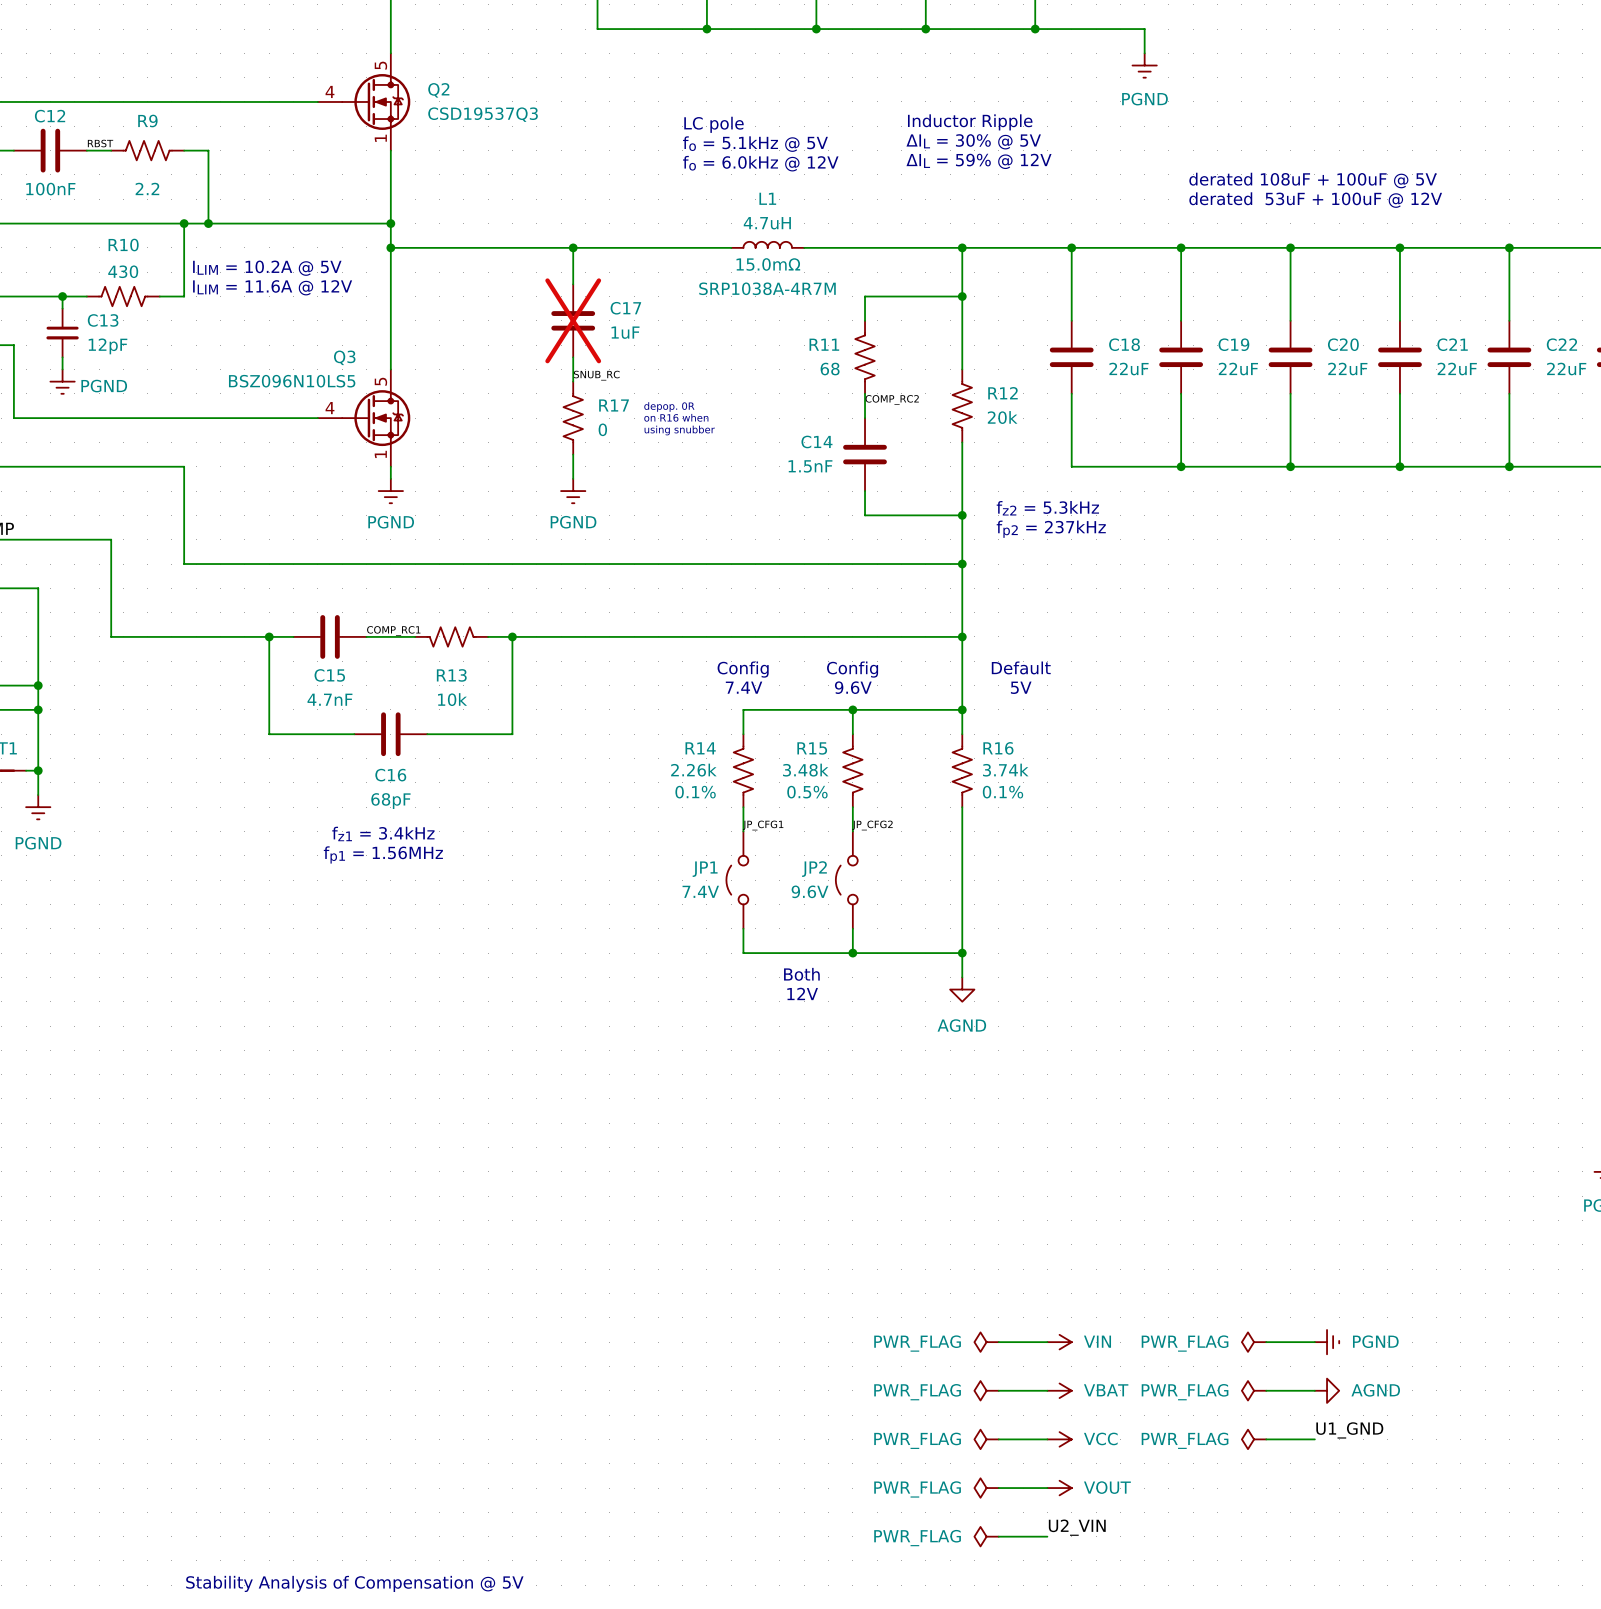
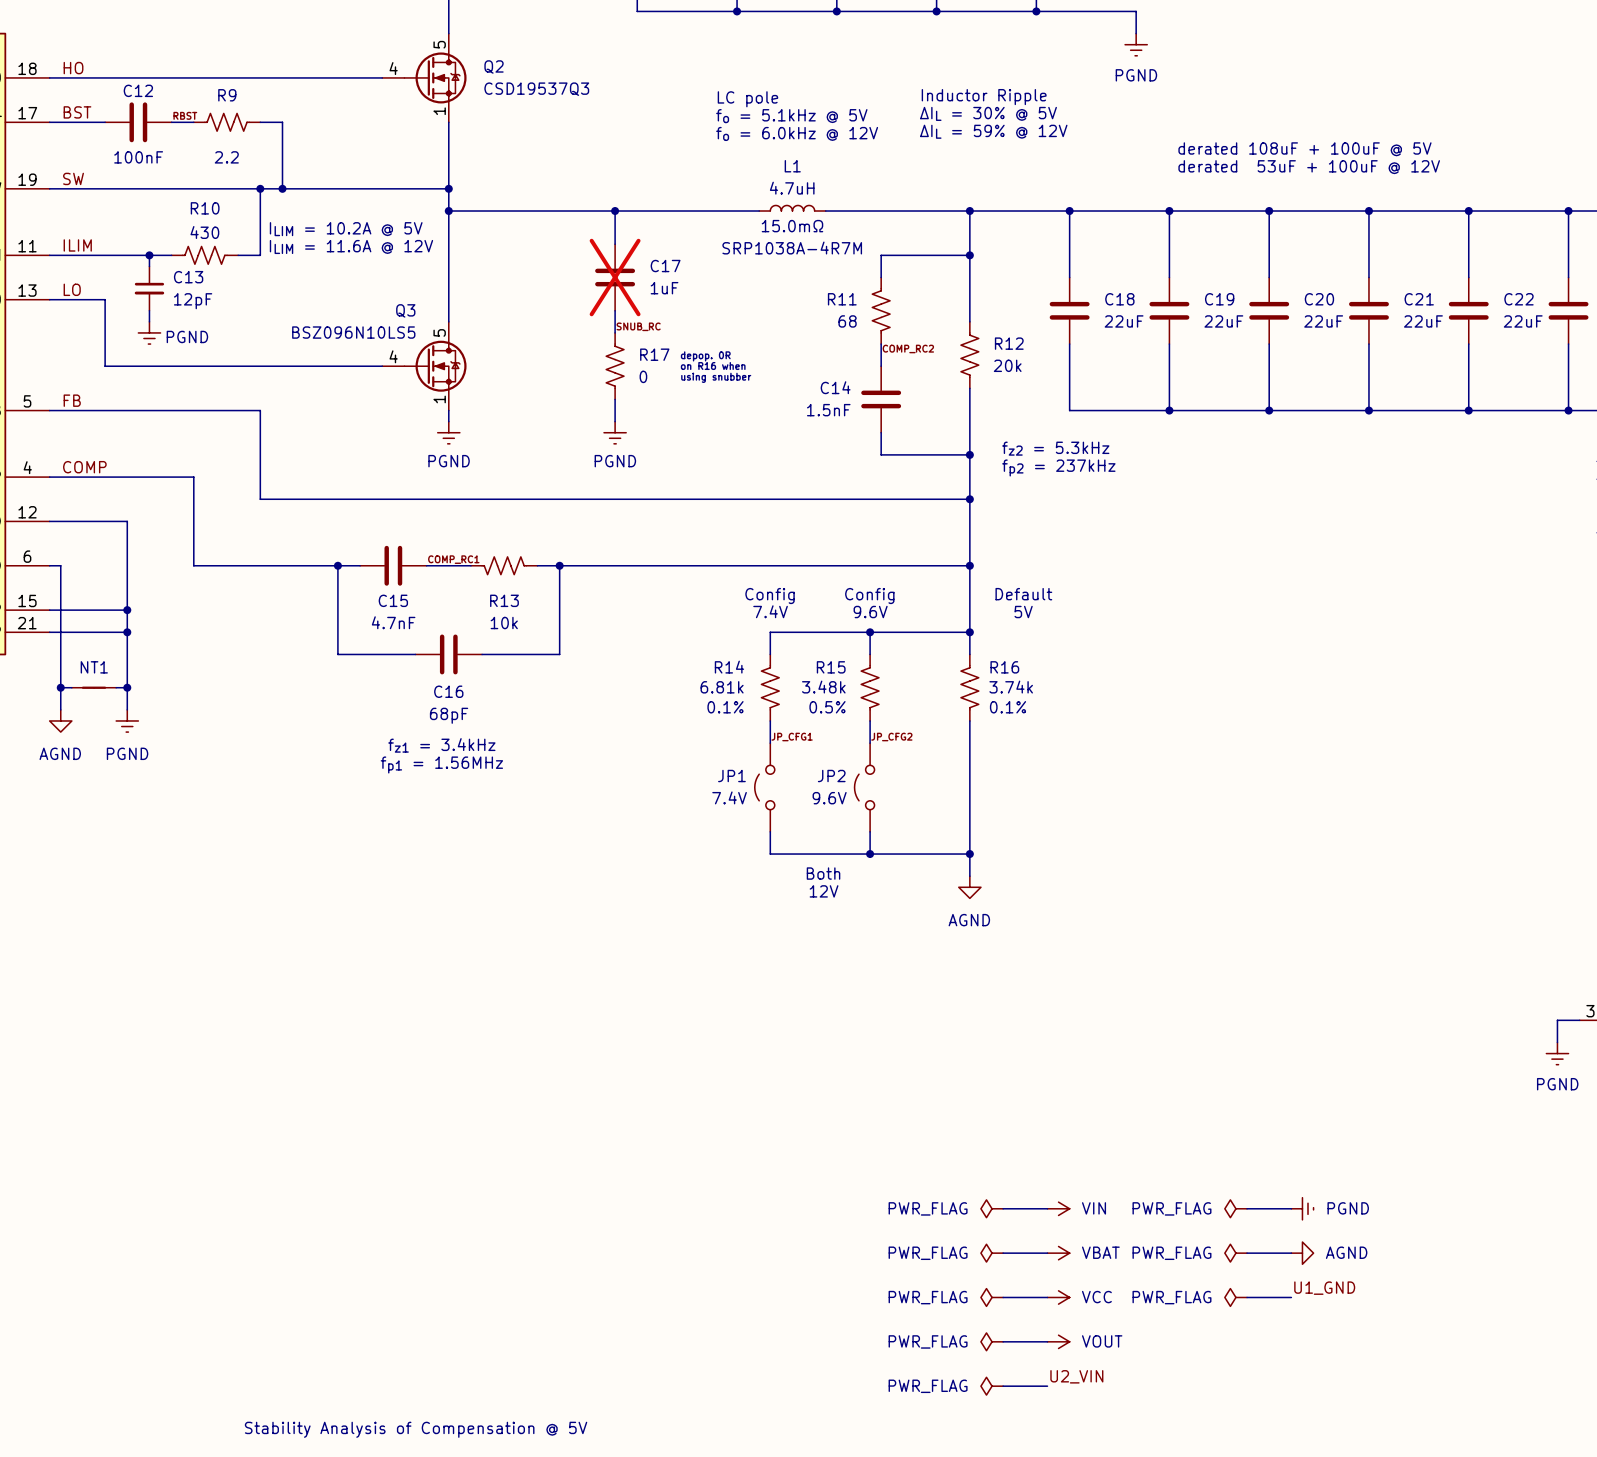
R14 value: 2.26k (693, 770) -> 6.81k (722, 687)

